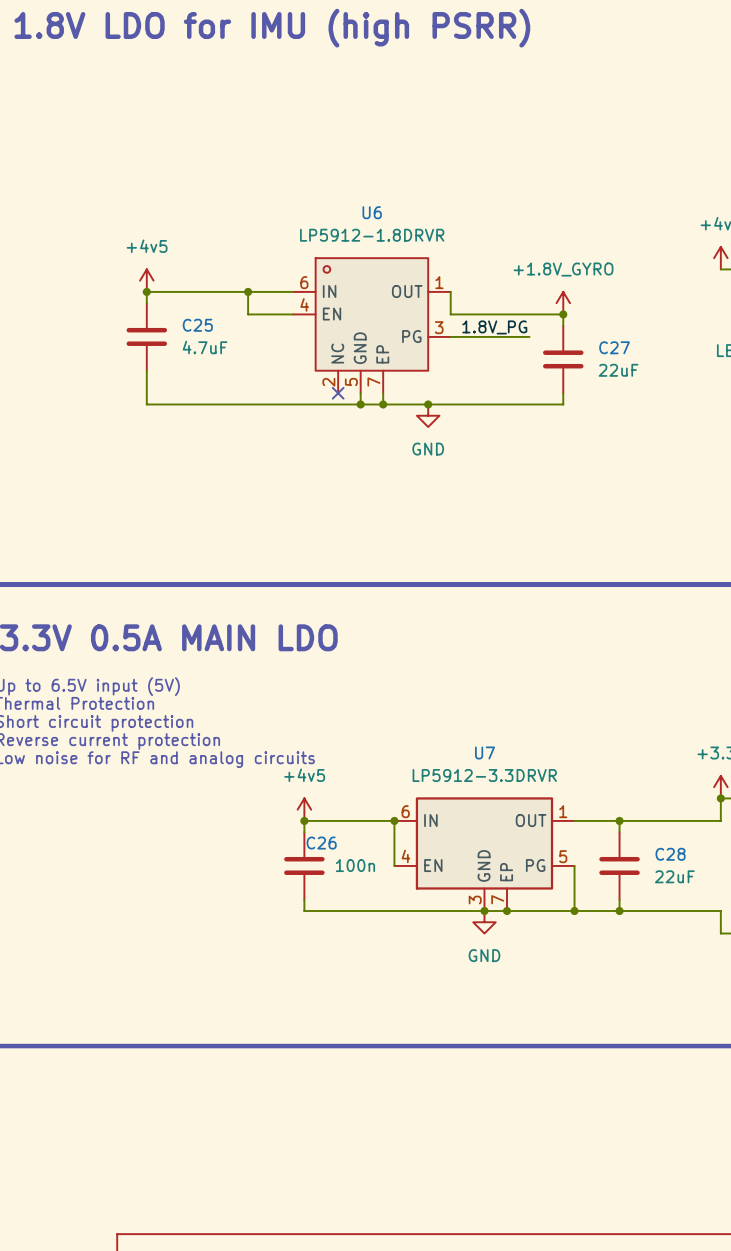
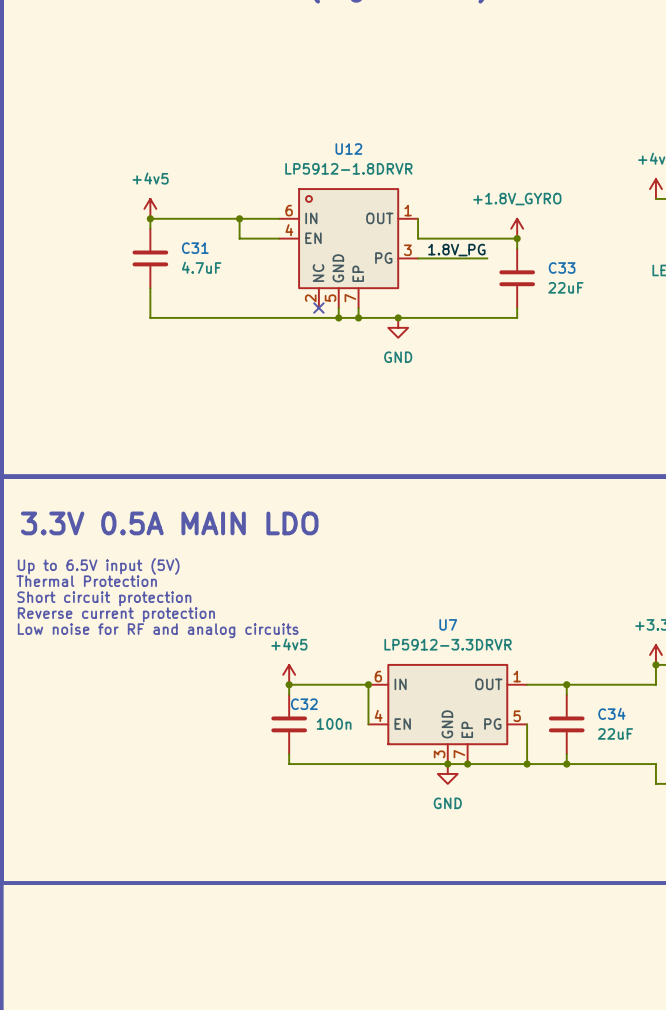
U6 name: U6 (372, 212) -> U12 (348, 149)
C25 name: C25 (197, 325) -> C31 (195, 248)
C27 name: C27 (614, 347) -> C33 (562, 267)
C26 name: C26 (321, 843) -> C32 (304, 704)
C28 name: C28 (670, 854) -> C34 (611, 713)

